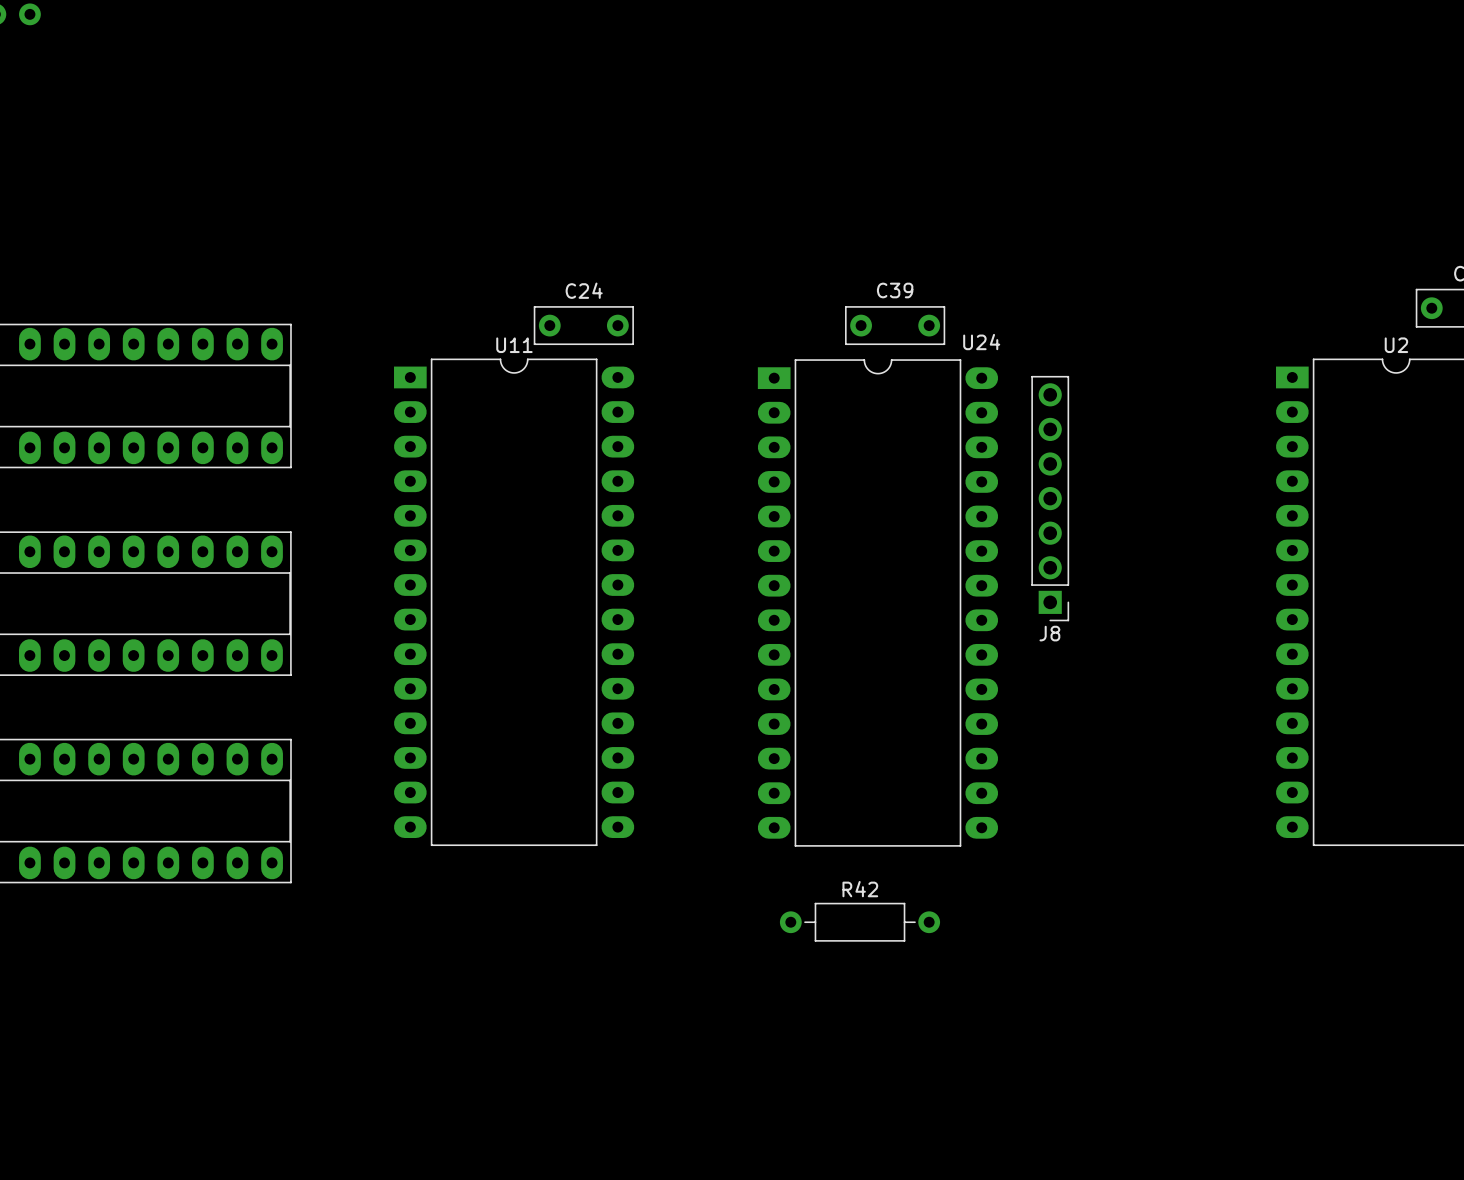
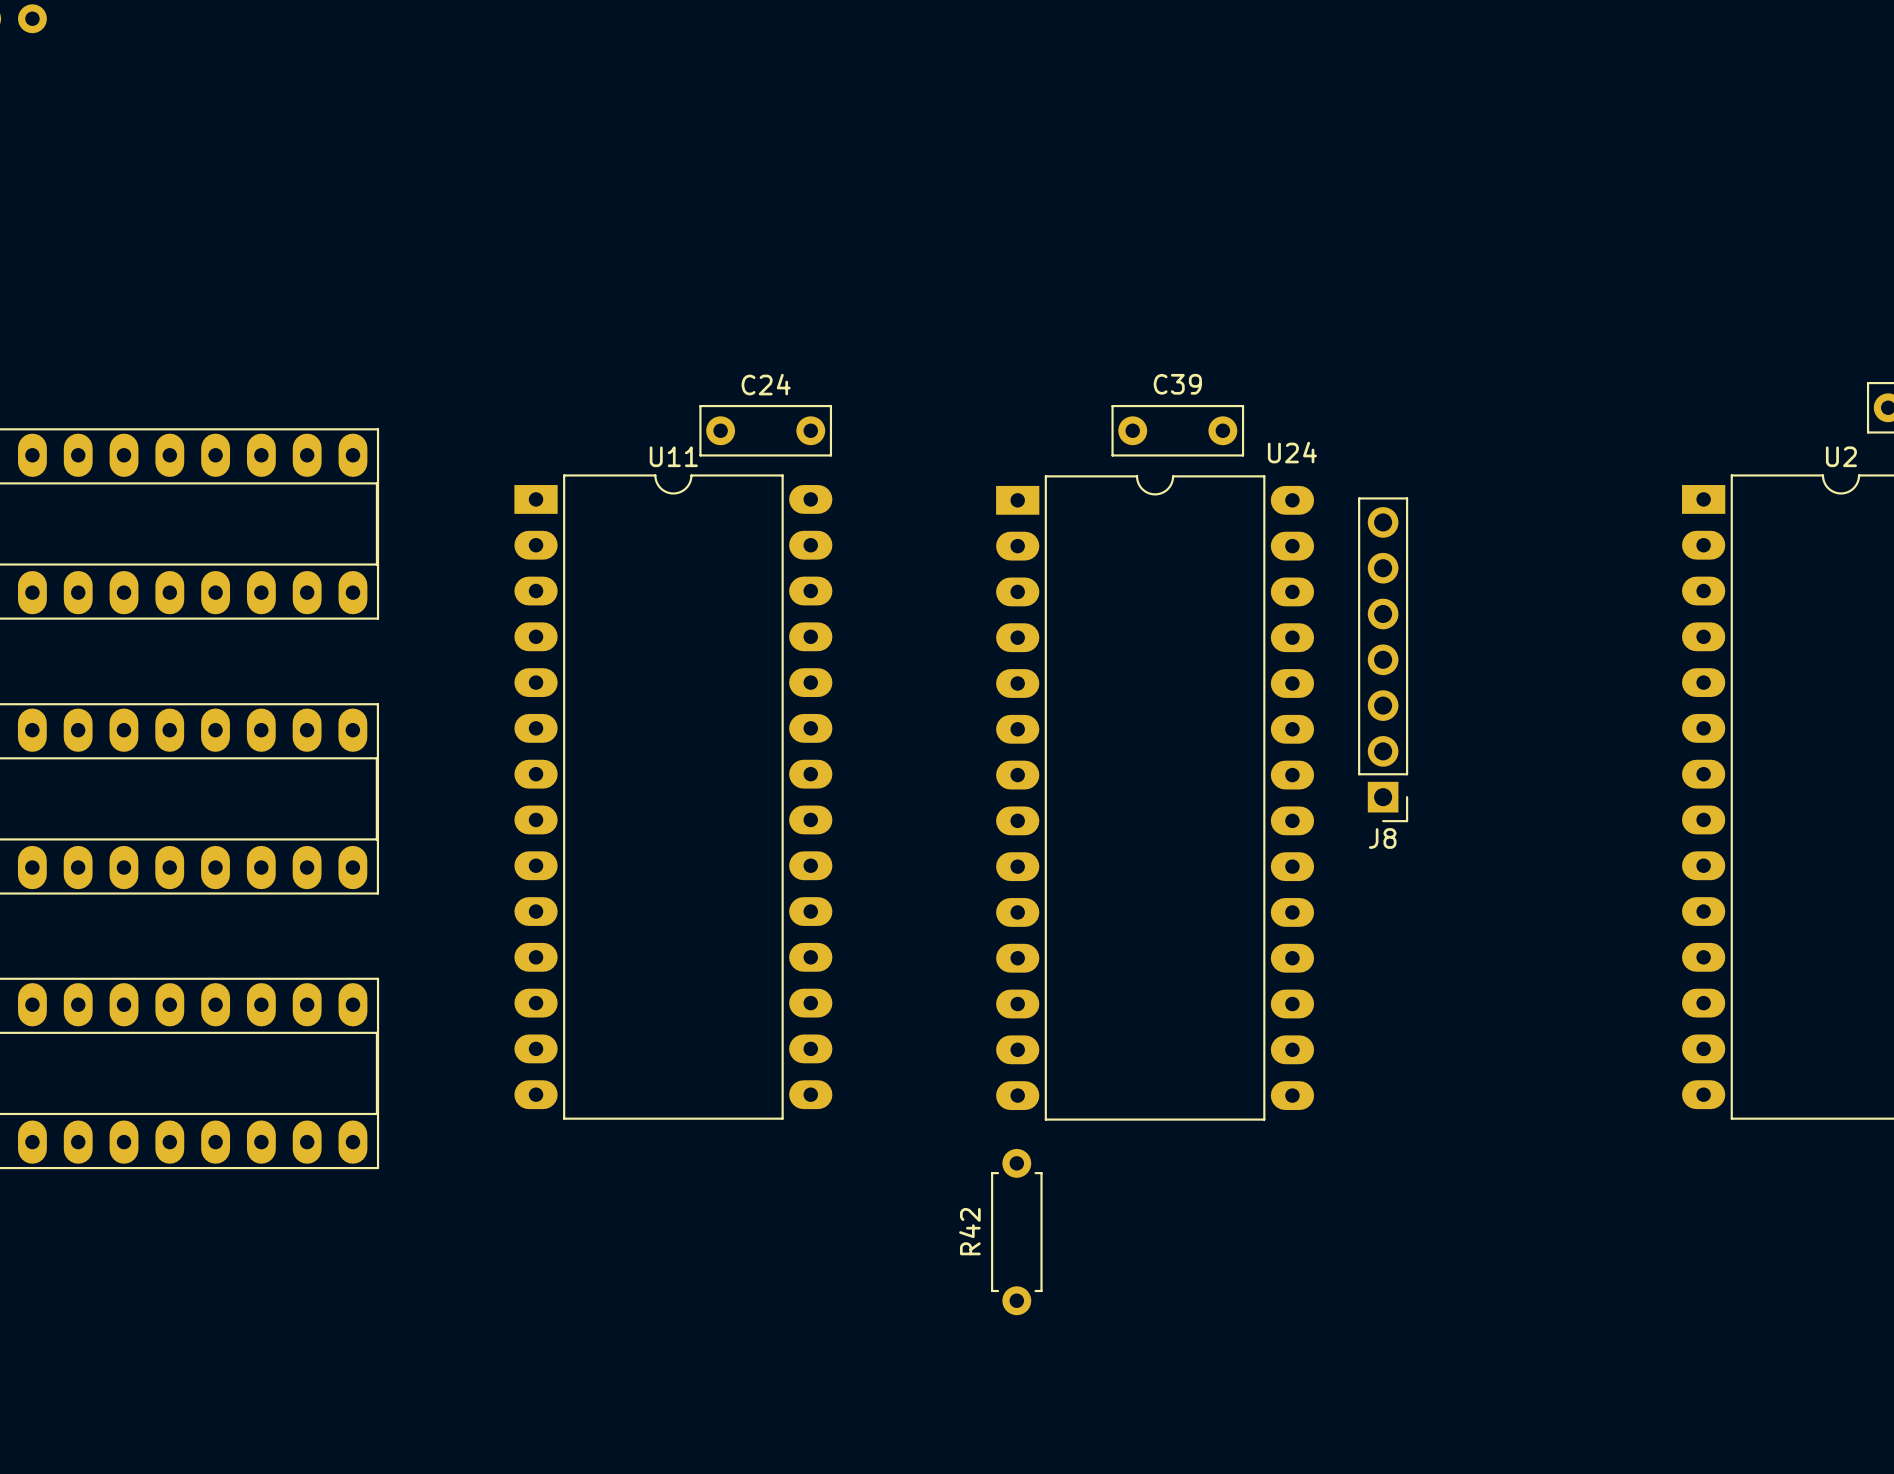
R42 name position: R42 (860, 889) -> R42 (969, 1231)
R42 footprint: [779, 902, 941, 942] -> [991, 1148, 1043, 1316]

